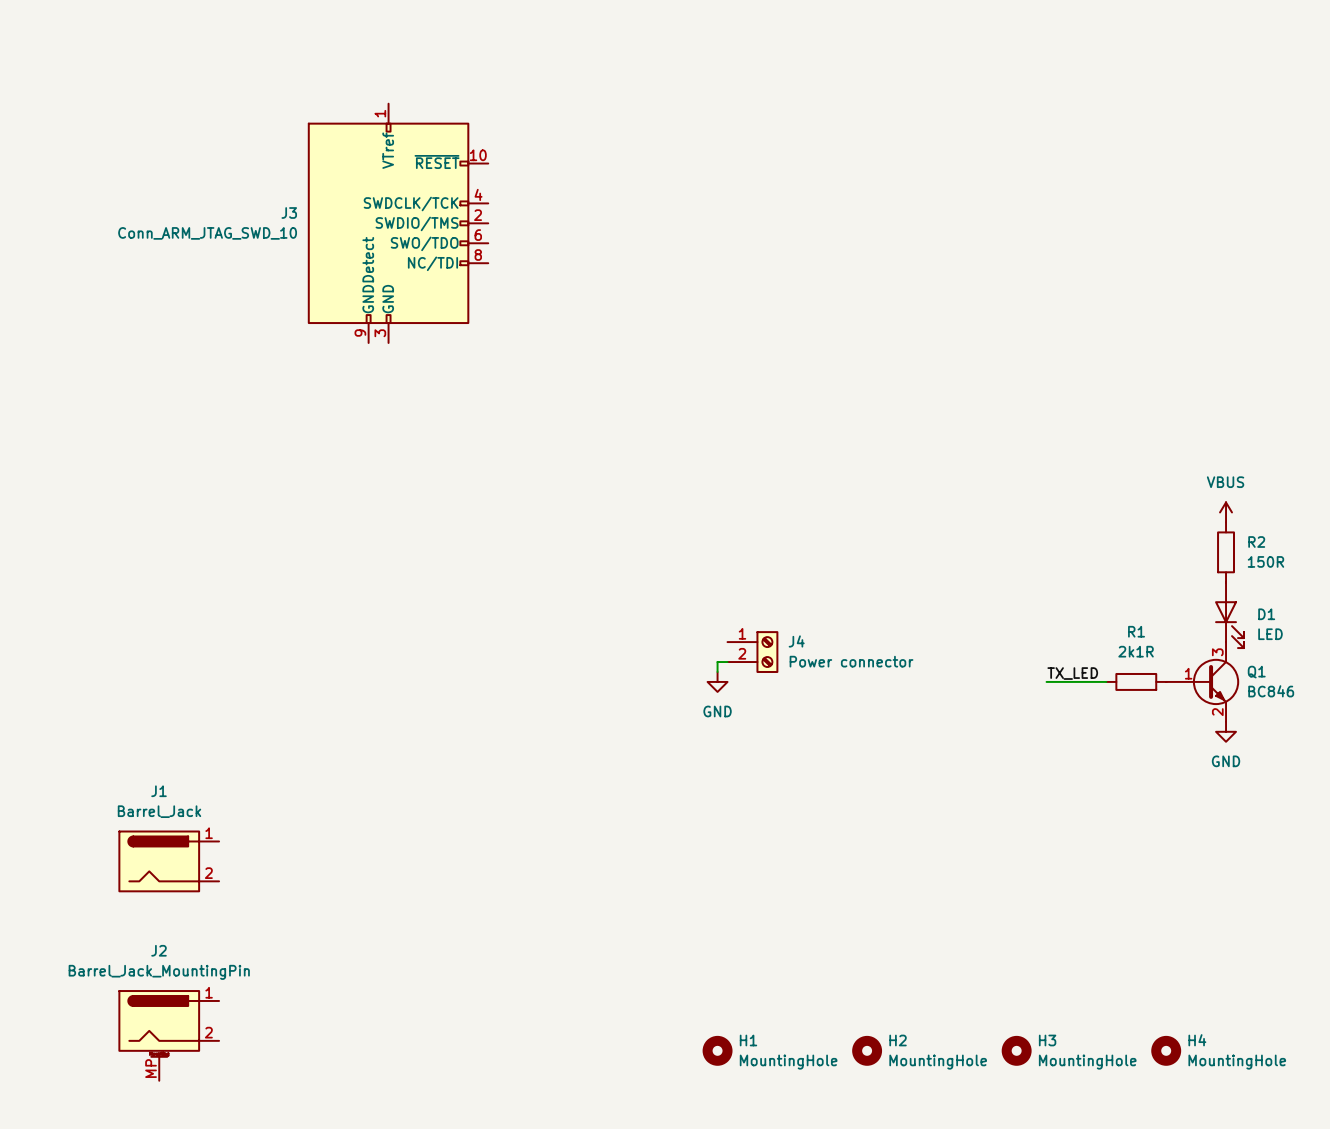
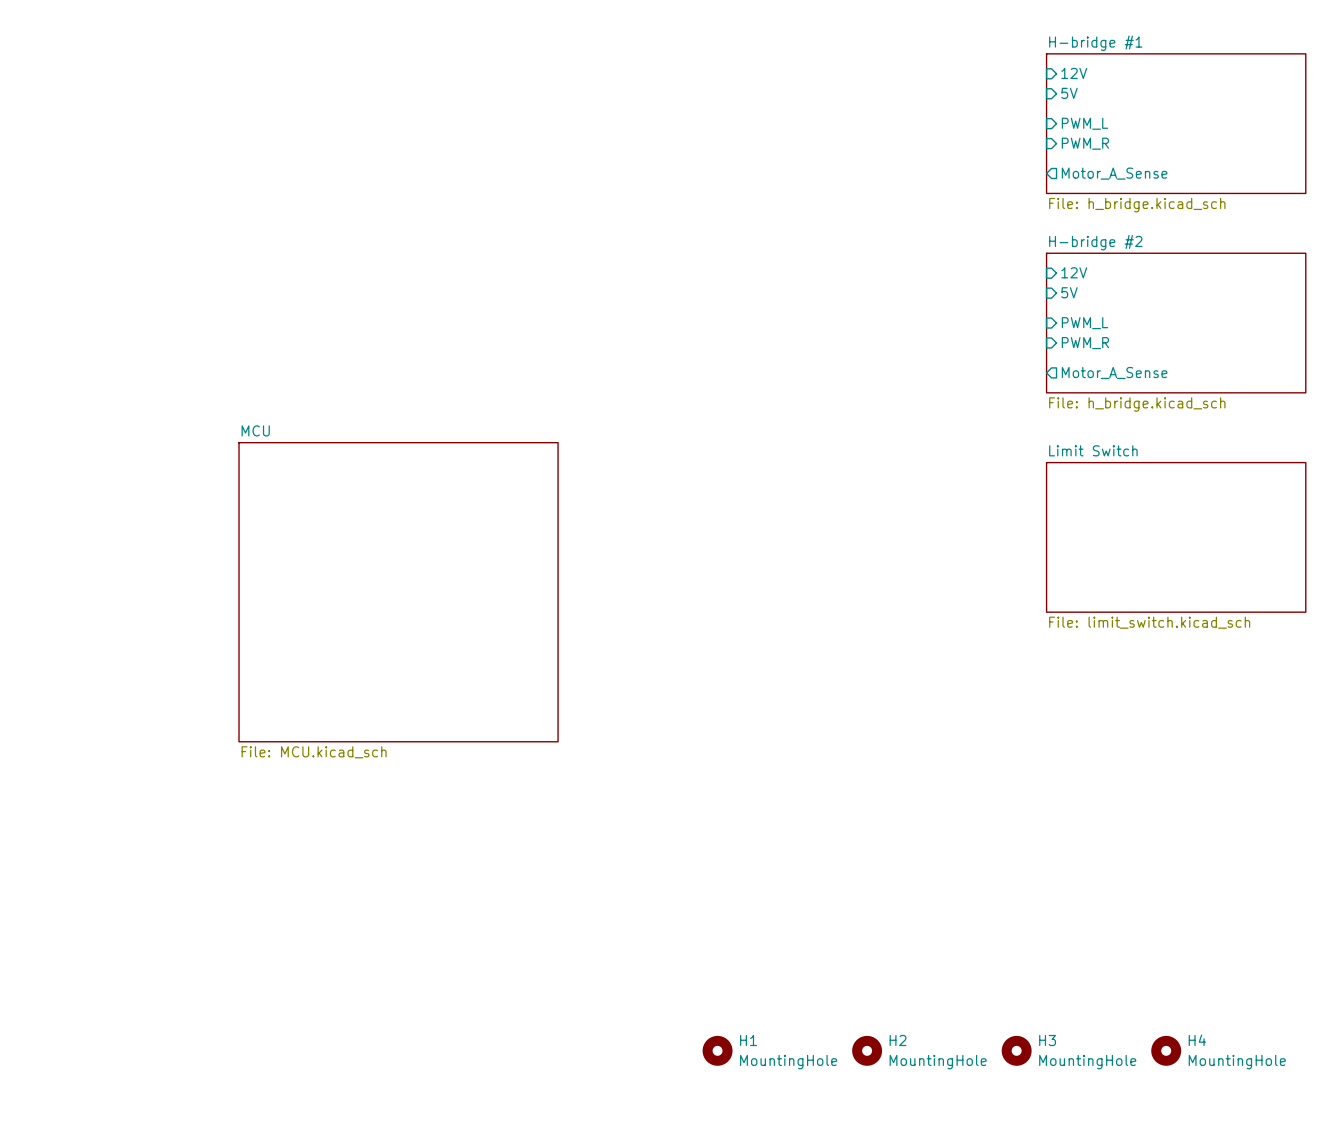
sheet pin: none -> 12V (1074, 73)
sheet pin: none -> 5V (1069, 93)
sheet pin: none -> PWM_L (1084, 123)
sheet H-bridge #1: none -> File: h_bridge.kicad_sch (1176, 123)
sheet pin: none -> PWM_R (1085, 143)
sheet pin: none -> Motor_A_Sense (1114, 173)
J3: Conn_ARM_JTAG_SWD_10 (398, 223) -> none
sheet pin: none -> 12V (1074, 272)
sheet pin: none -> 5V (1069, 292)
sheet pin: none -> PWM_L (1084, 323)
sheet H-bridge #2: none -> File: h_bridge.kicad_sch (1176, 323)
sheet pin: none -> PWM_R (1085, 343)
sheet pin: none -> Motor_A_Sense (1114, 372)
power symbol: VBUS (1226, 512) -> none
sheet Limit Switch: none -> File: limit_switch.kicad_sch (1176, 537)
R2: 150R (1226, 552) -> none
sheet MCU: none -> File: MCU.kicad_sch (398, 592)
D1: LED (1229, 615) -> none
J4: Power connector (752, 652) -> none
wire: (727, 662) (717, 662) (717, 671) -> none
label: TX_LED (1072, 673) -> none
power symbol: GND (717, 681) -> none
wire: (1046, 681) (1106, 681) -> none
R1: 2k1R (1136, 681) -> none
Q1: BC846 (1202, 681) -> none
power symbol: GND (1226, 731) -> none
J1: Barrel_Jack (168, 861) -> none
J2: Barrel_Jack_MountingPin (168, 1035) -> none

